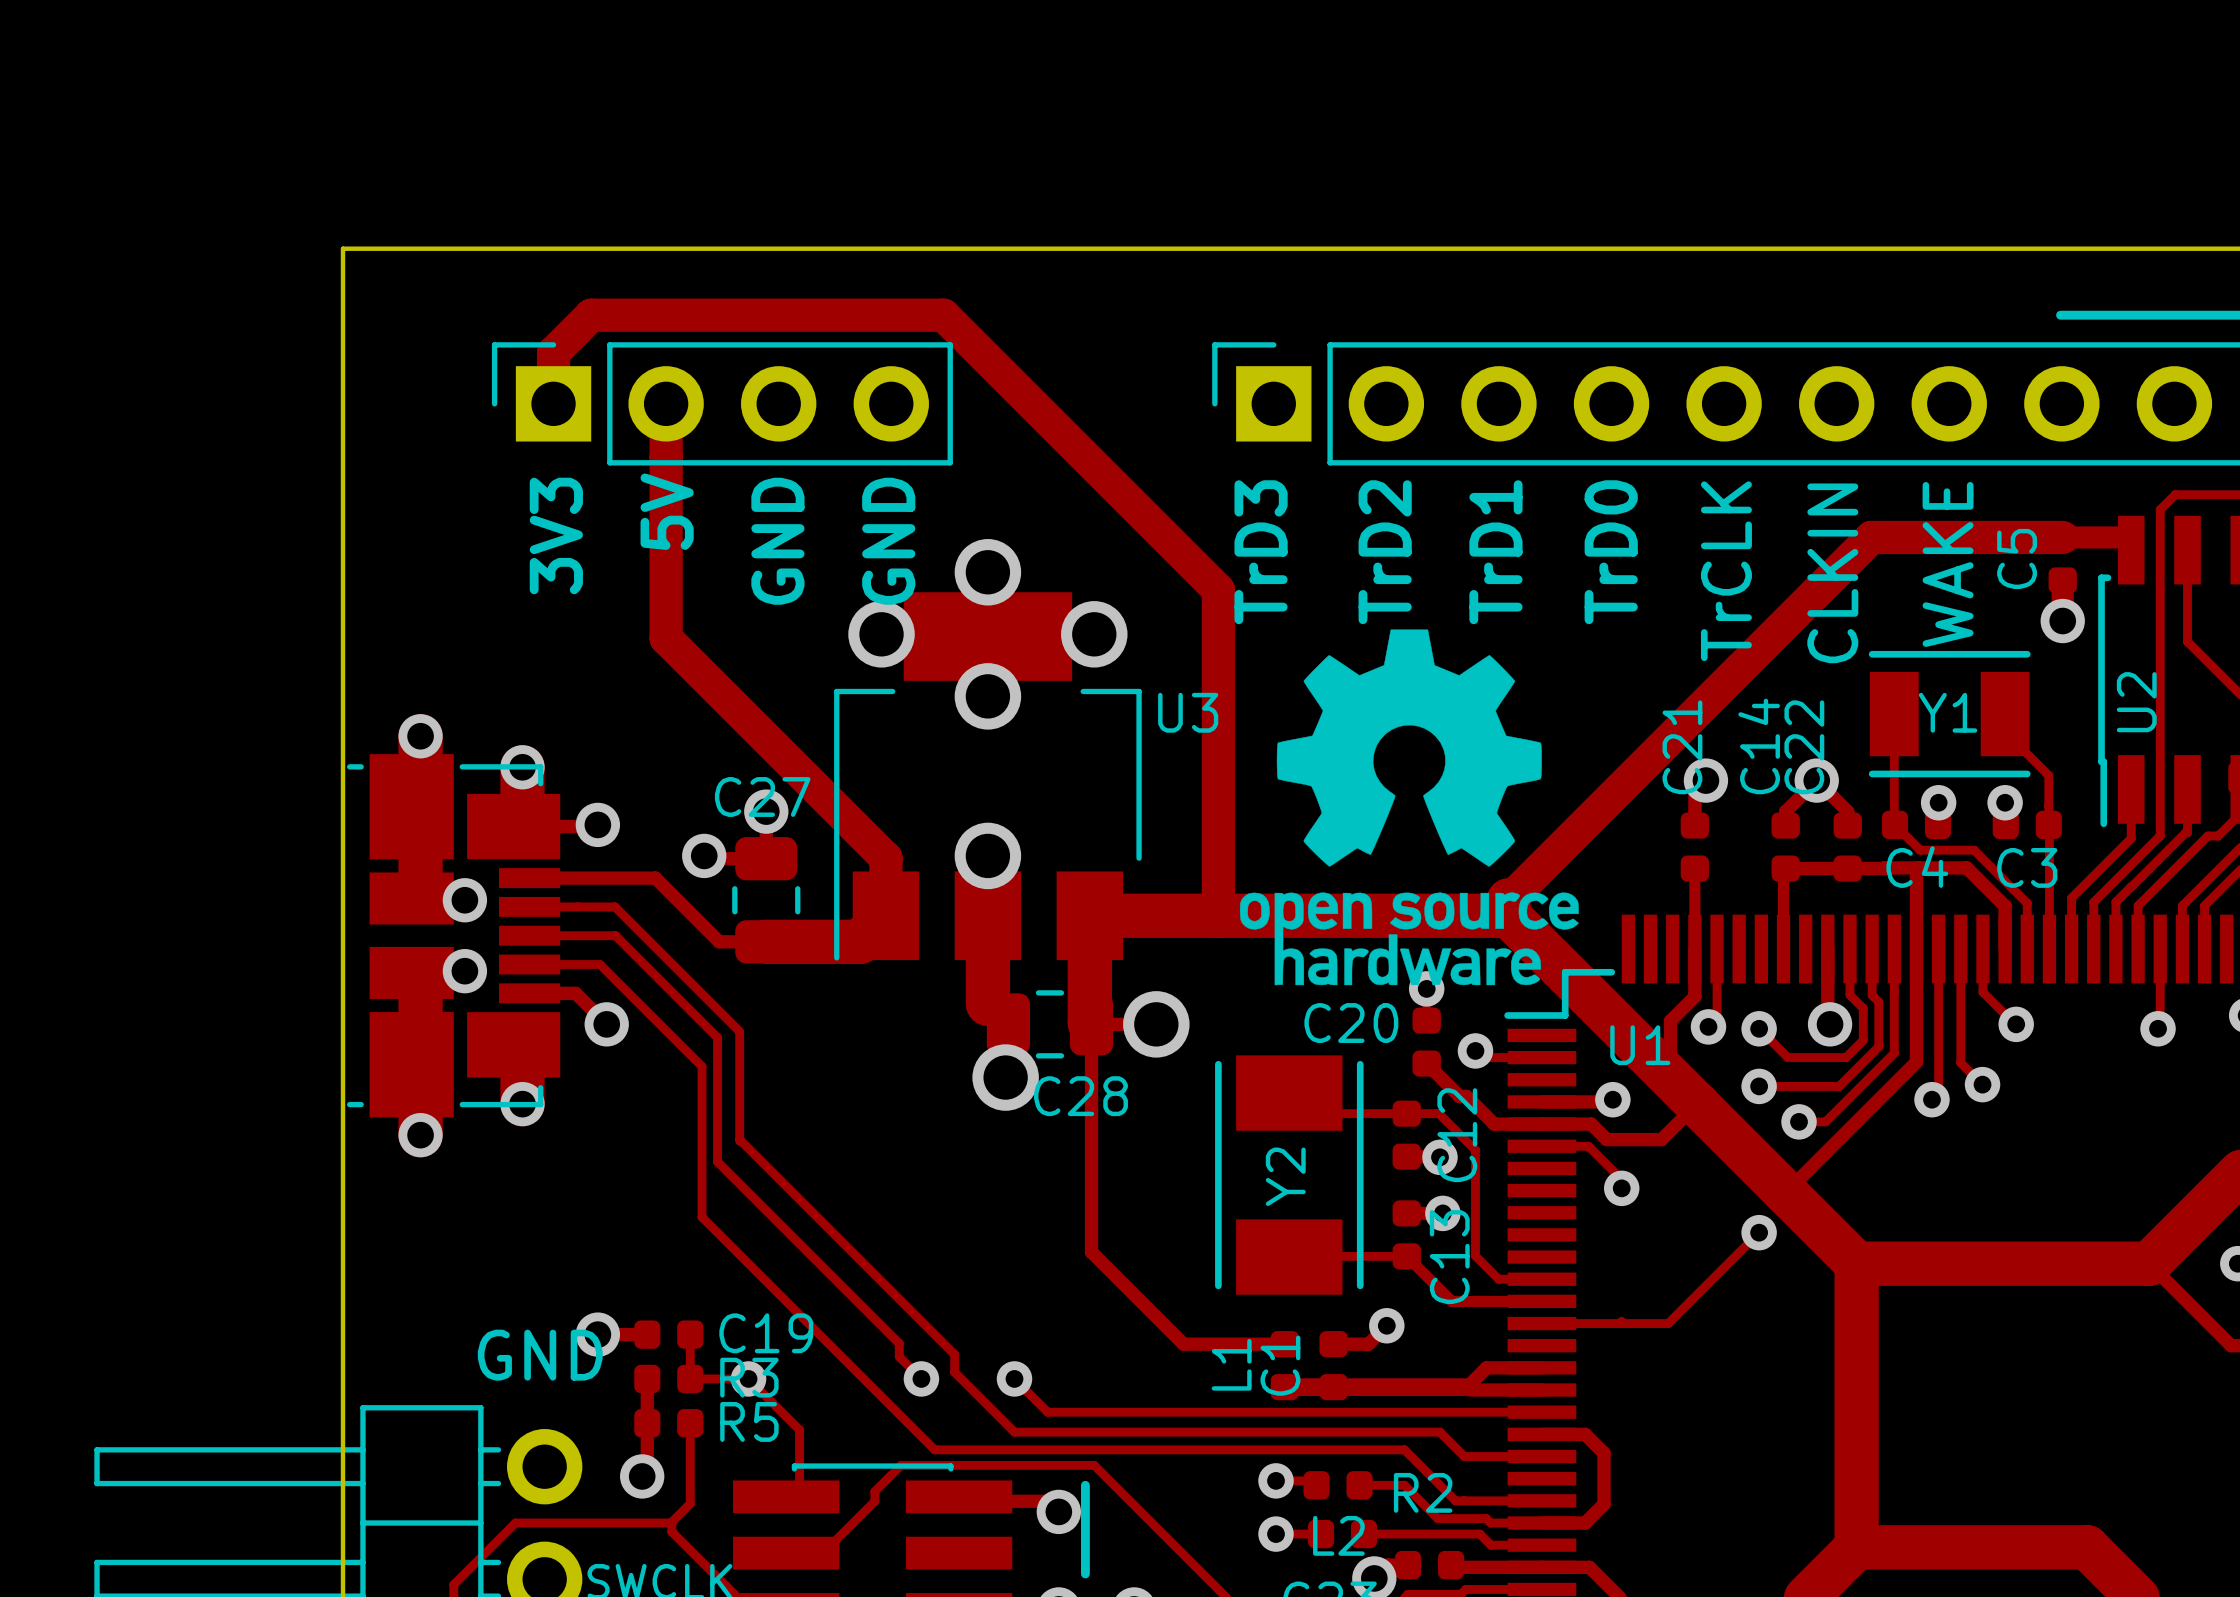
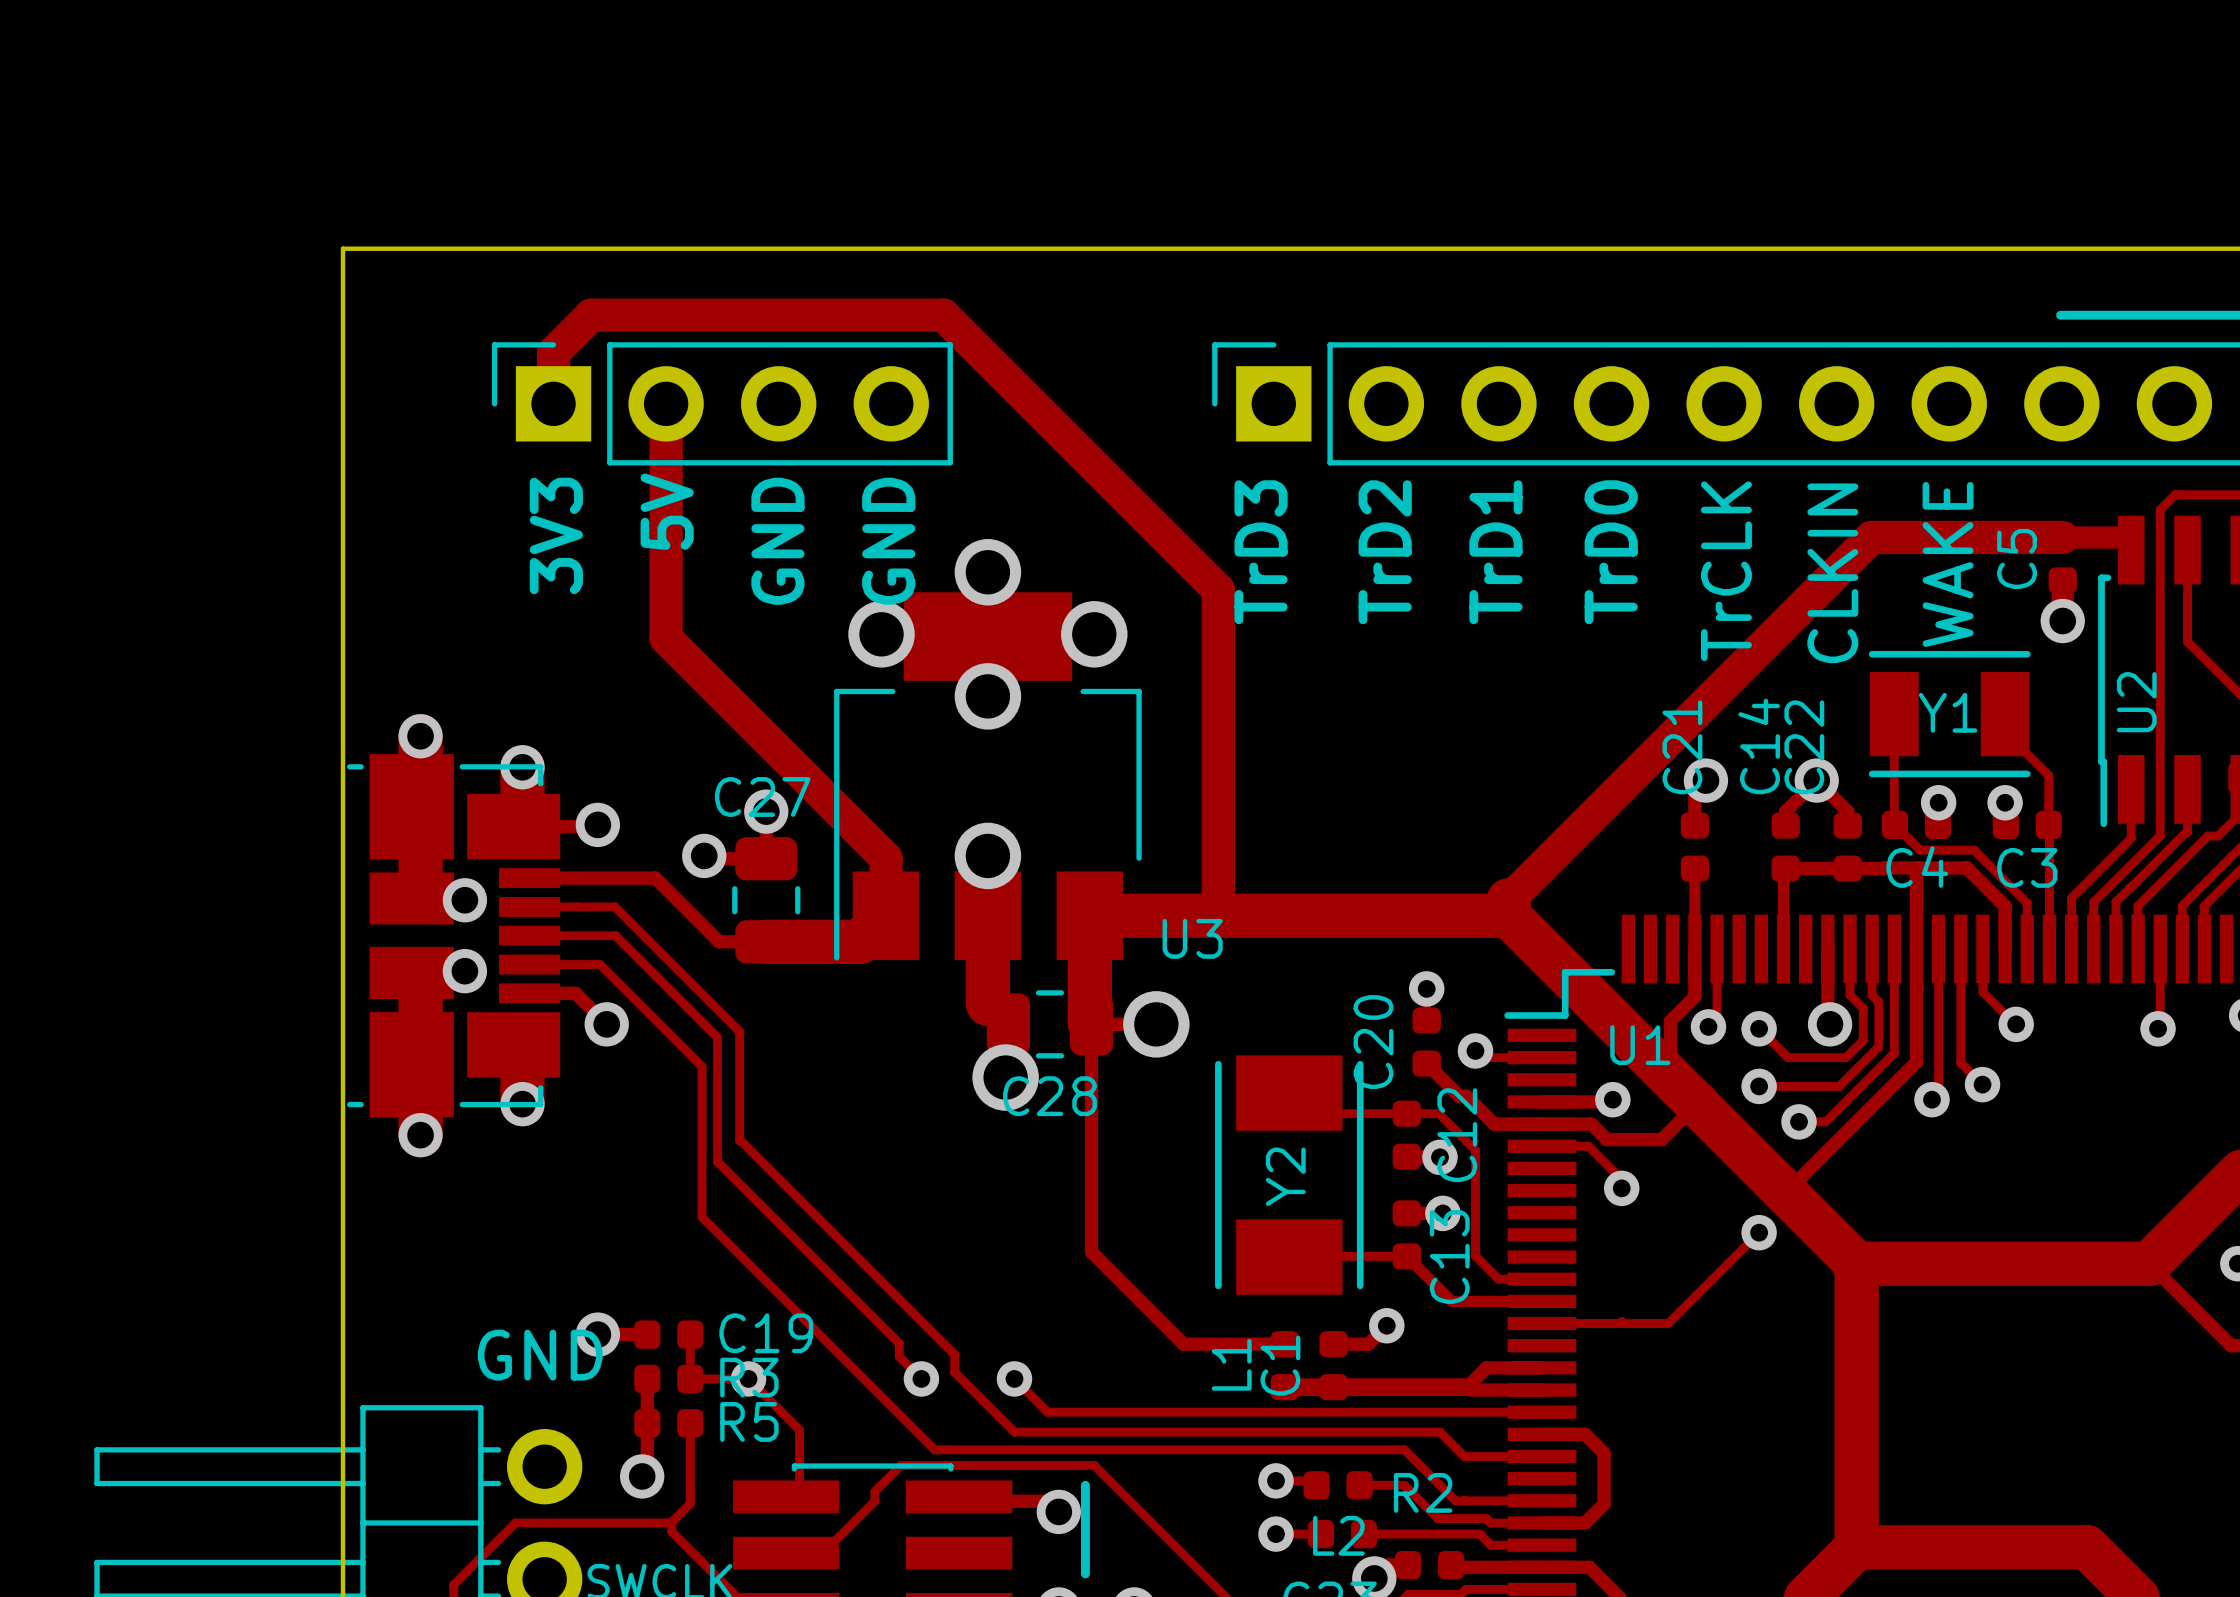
drawing: [1239, 629, 1579, 986] -> none
U3 name position: U3 (1188, 712) -> U3 (1192, 938)
C20 name rotation: 0° (1351, 1023) -> 90° counterclockwise (1373, 1042)
C28 name position: C28 (1080, 1096) -> C28 (1049, 1096)

